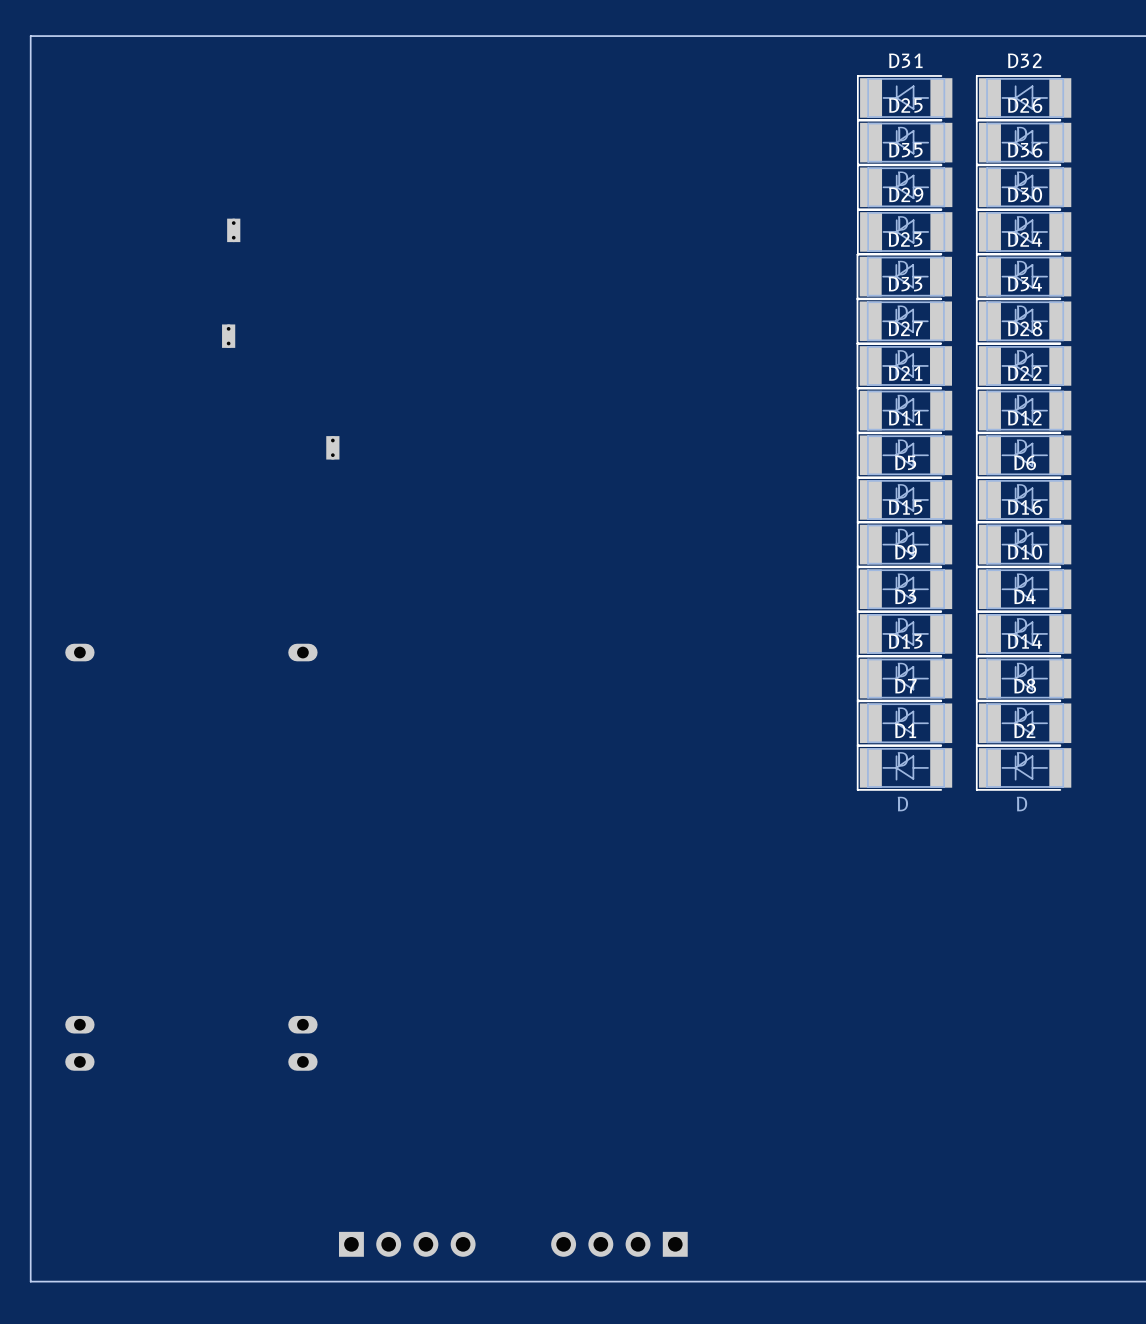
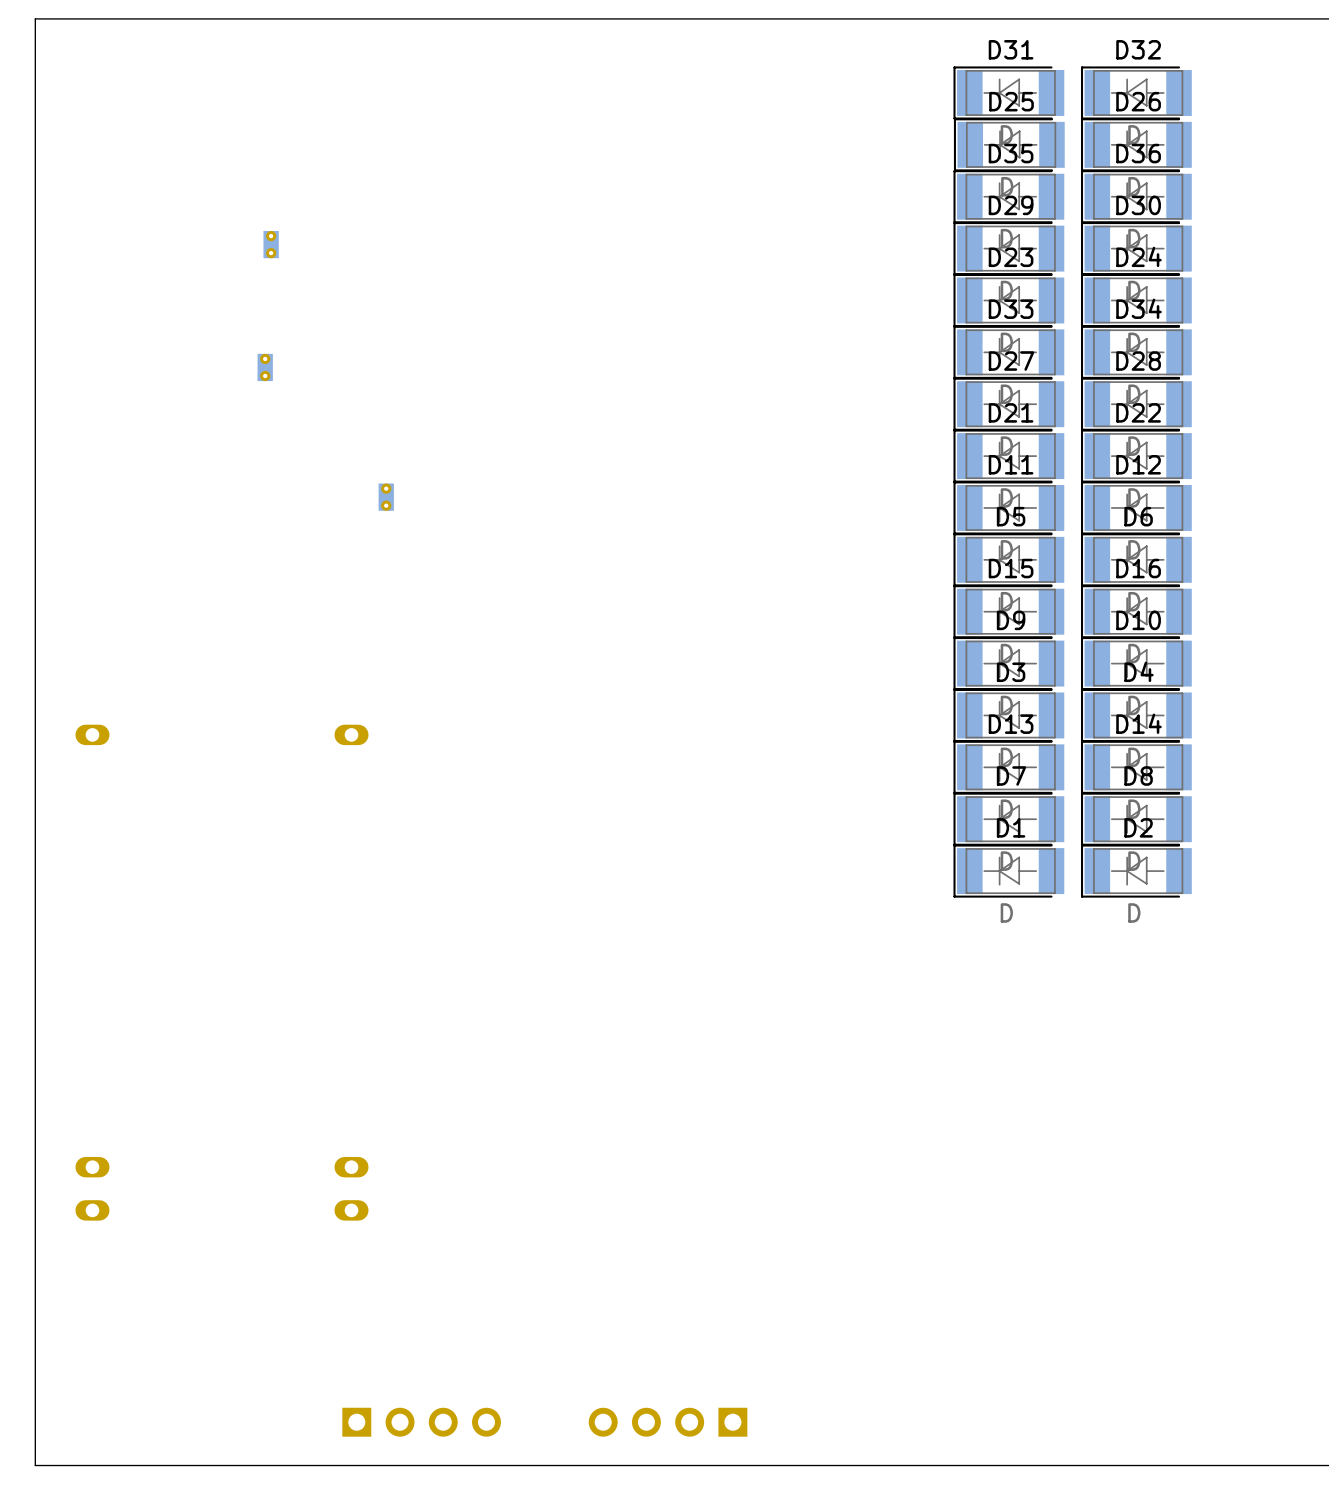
D31 position: (904, 97) -> (1008, 92)
D32 position: (1023, 97) -> (1136, 92)
D25 position: (904, 142) -> (1009, 144)
D26 position: (1023, 142) -> (1136, 144)
D35 position: (904, 187) -> (1008, 196)
D36 position: (1023, 187) -> (1136, 196)
D29 position: (904, 231) -> (1008, 248)
D30 position: (1023, 231) -> (1136, 248)
D23 position: (904, 276) -> (1008, 300)
D24 position: (1023, 276) -> (1136, 300)
D33 position: (904, 321) -> (1008, 352)
D34 position: (1023, 321) -> (1136, 352)
D27 position: (904, 365) -> (1008, 404)
D28 position: (1023, 365) -> (1136, 404)
D21 position: (904, 410) -> (1008, 456)
D22 position: (1023, 410) -> (1136, 456)
D11 position: (904, 455) -> (1008, 507)
D12 position: (1023, 455) -> (1136, 507)
D5 position: (904, 499) -> (1008, 559)
D6 position: (1023, 499) -> (1136, 559)
D15 position: (904, 544) -> (1008, 611)
D16 position: (1023, 544) -> (1136, 611)
D9 position: (904, 589) -> (1008, 663)
D10 position: (1023, 589) -> (1136, 663)
D3 position: (904, 633) -> (1008, 715)
D4 position: (1023, 633) -> (1136, 715)
D13 position: (904, 678) -> (1008, 767)
D14 position: (1023, 678) -> (1136, 767)
D7 position: (904, 723) -> (1008, 819)
D8 position: (1023, 723) -> (1136, 819)
D1 position: (904, 767) -> (1008, 871)
D2 position: (1023, 767) -> (1136, 871)
part position: (407, 1244) -> (421, 1422)
part position: (619, 1244) -> (668, 1422)

